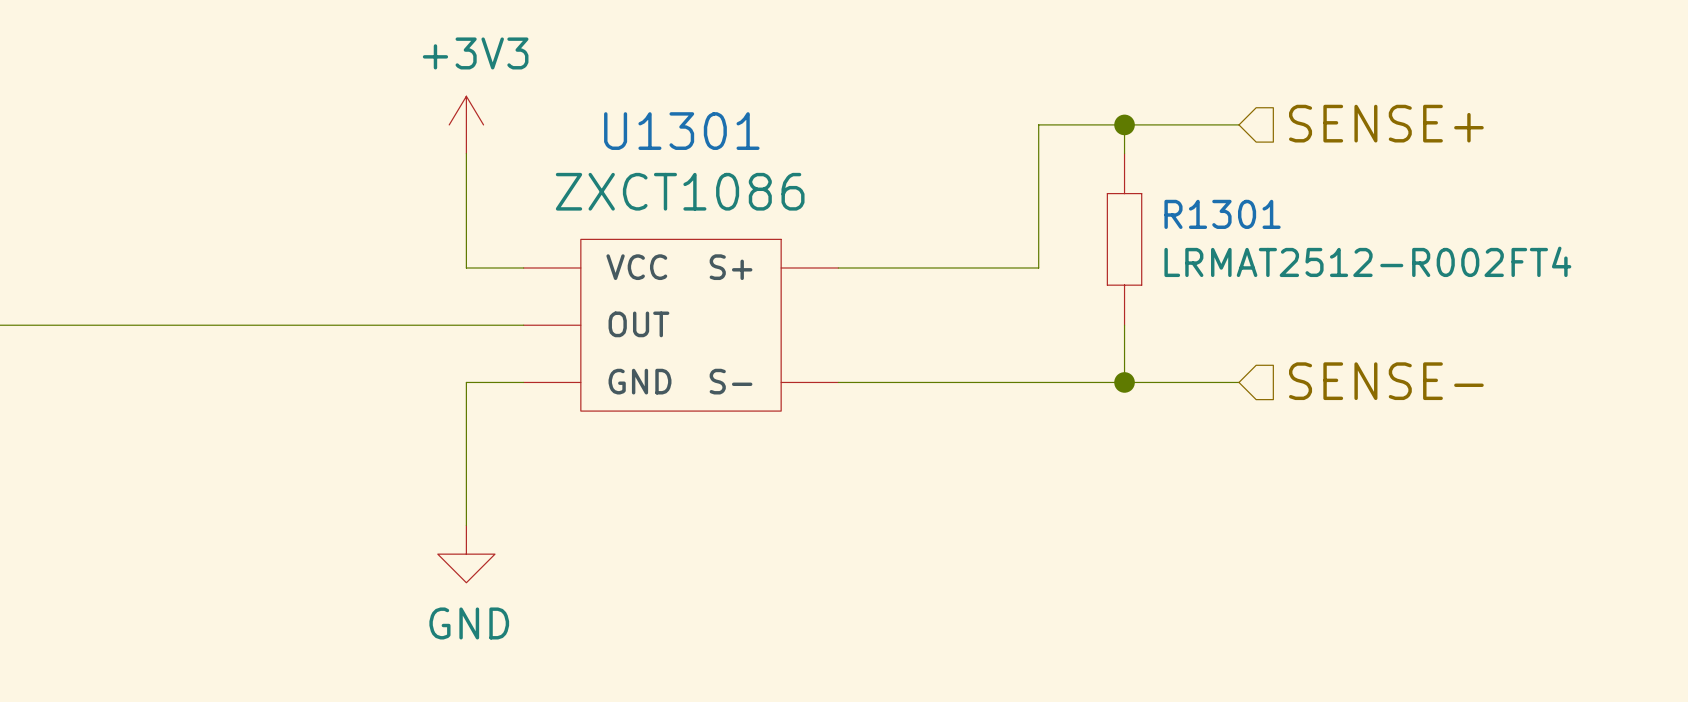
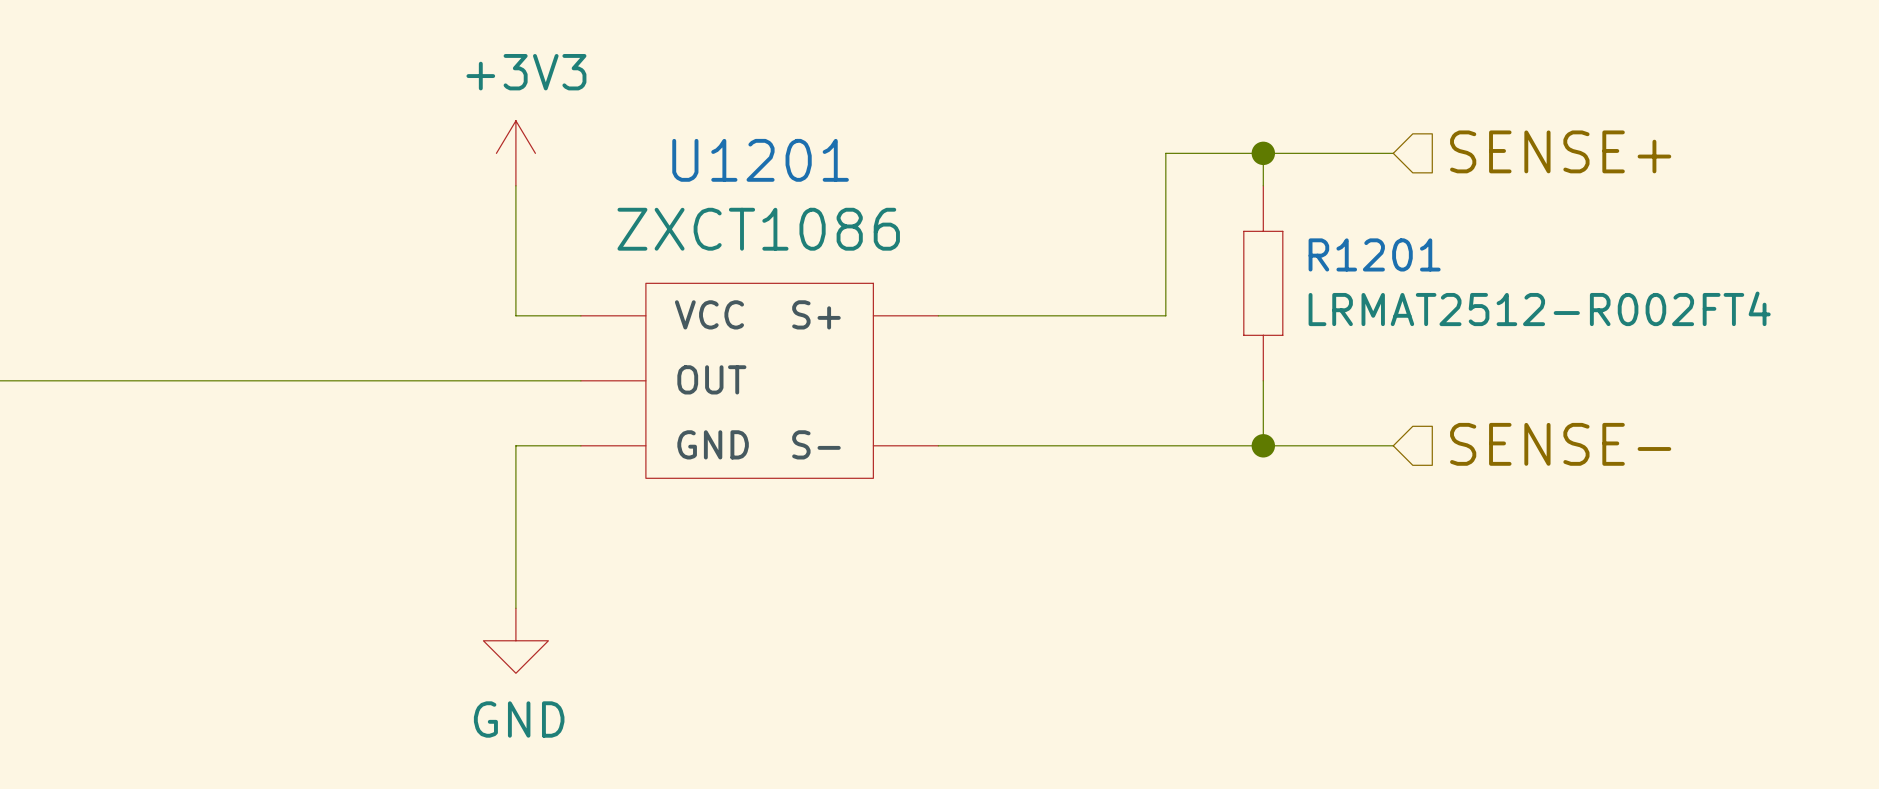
U1301 name: U1301 (681, 131) -> U1201 (760, 160)
R1301 name: R1301 (1222, 214) -> R1201 (1374, 254)

